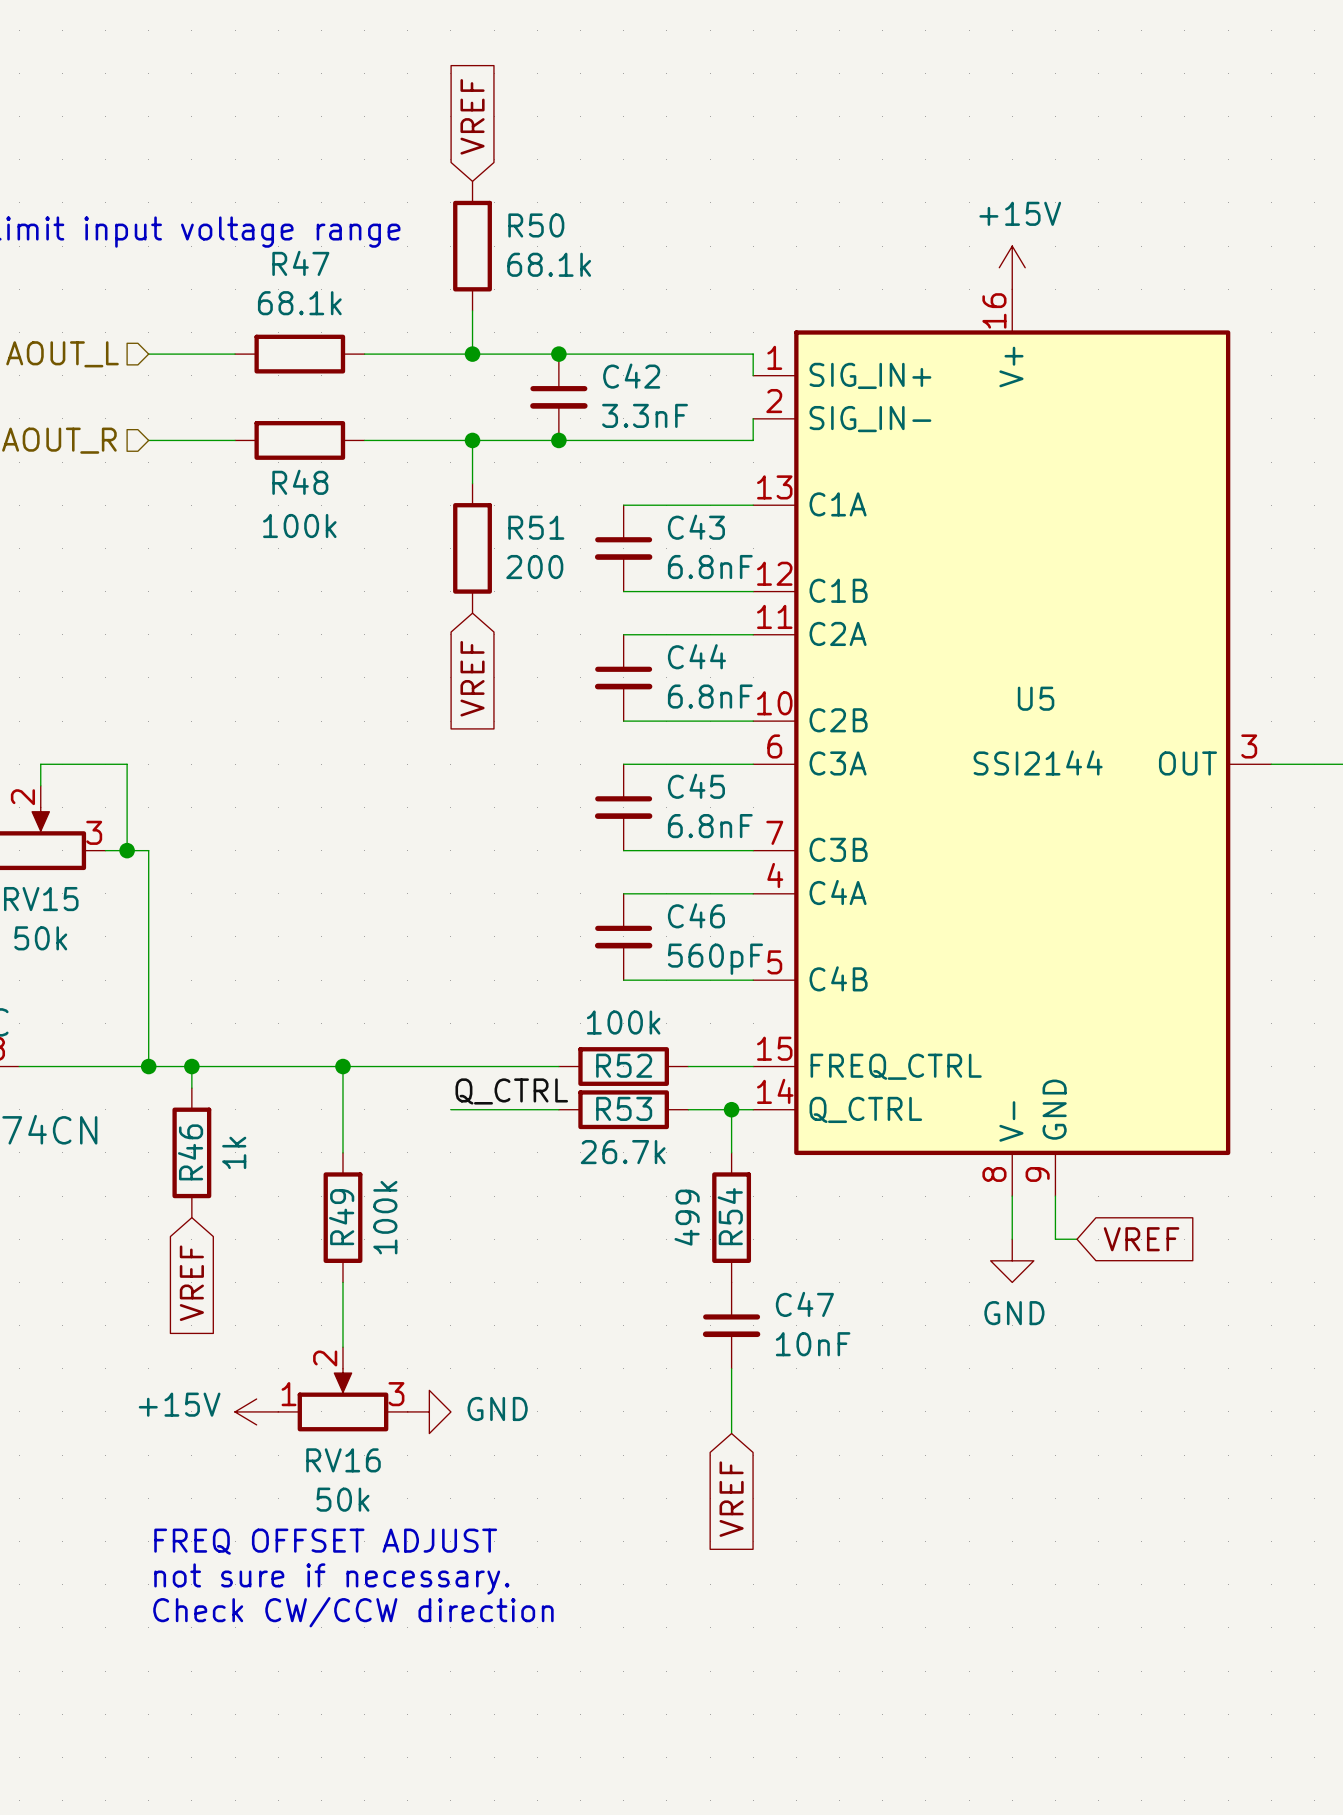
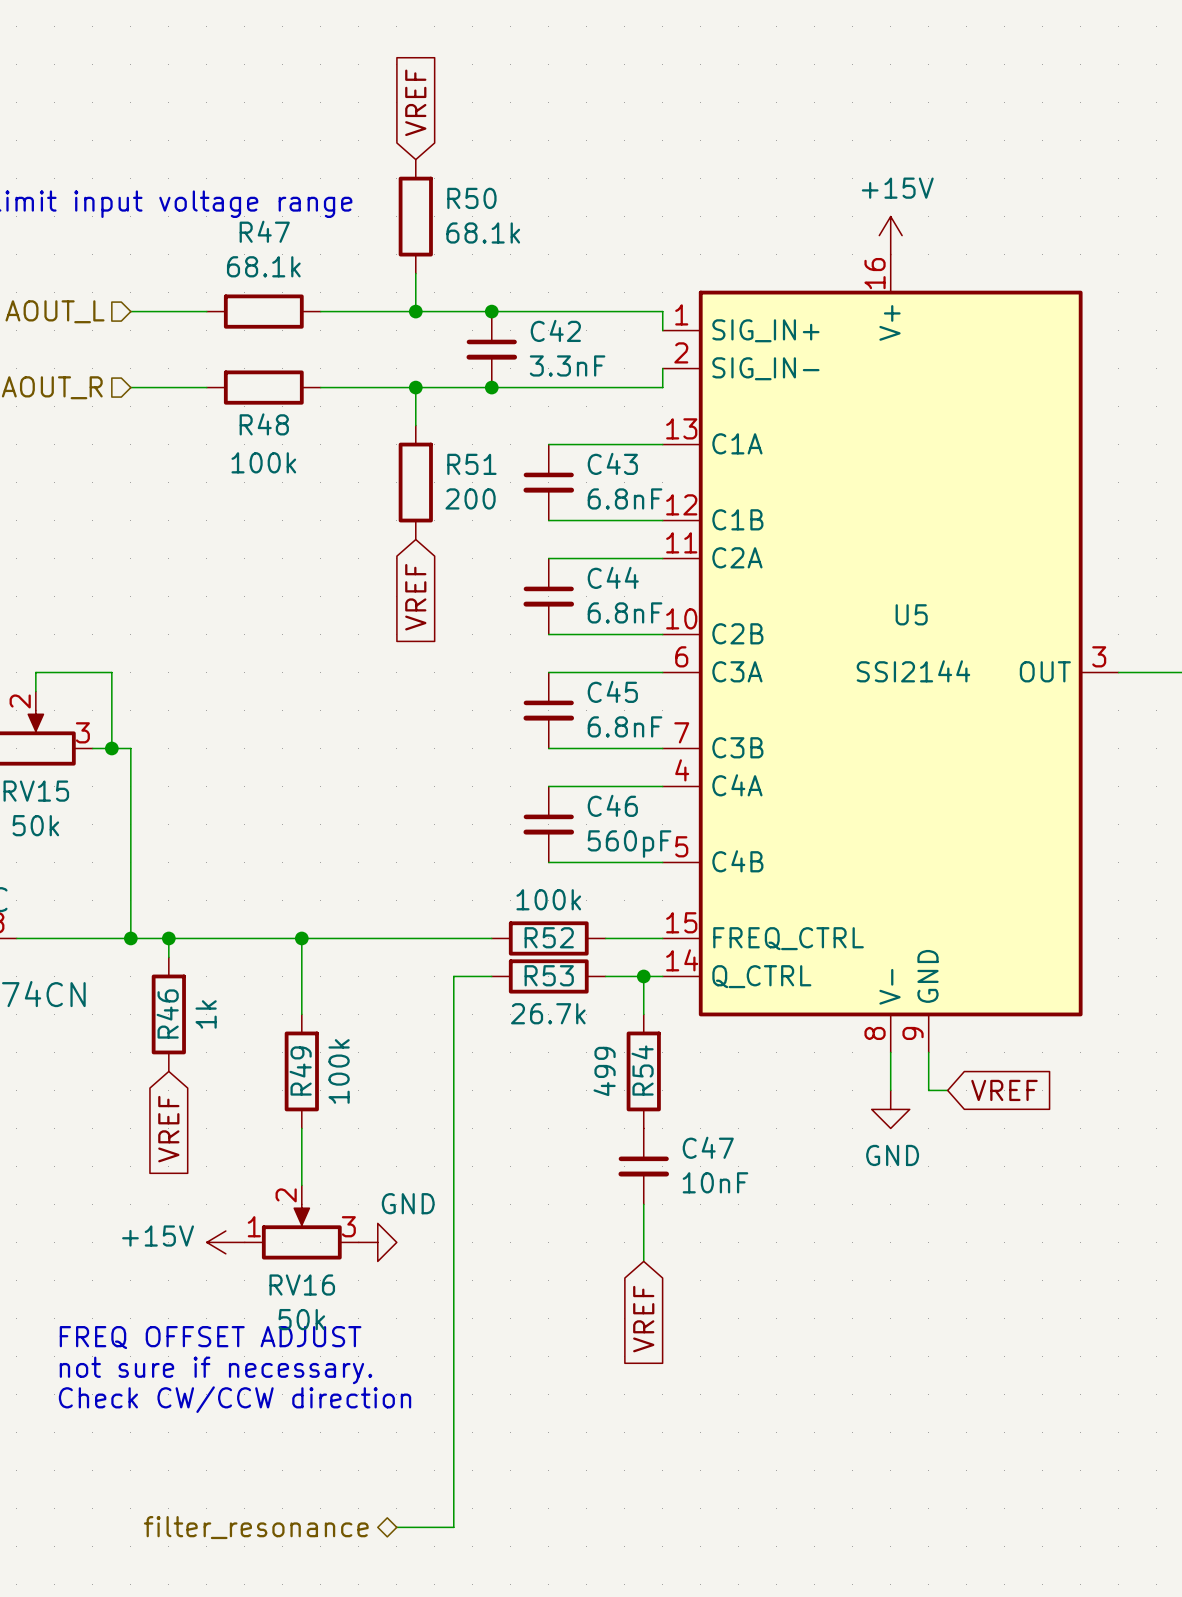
label: Q_CTRL (511, 1091) -> none
wire: (450, 1109) (515, 1109) -> (396, 1527) (453, 1527) (453, 976)
power symbol text position: GND (497, 1408) -> GND (408, 1203)
text position: FREQ OFFSET ADJUST (325, 1541) -> FREQ OFFSET ADJUST (210, 1337)
text position: not sure if necessary. (331, 1579) -> not sure if necessary. (216, 1370)
text position: Check CW/CCW direction (353, 1612) -> Check CW/CCW direction (235, 1399)
hierarchical label: none -> filter_resonance (256, 1527)

